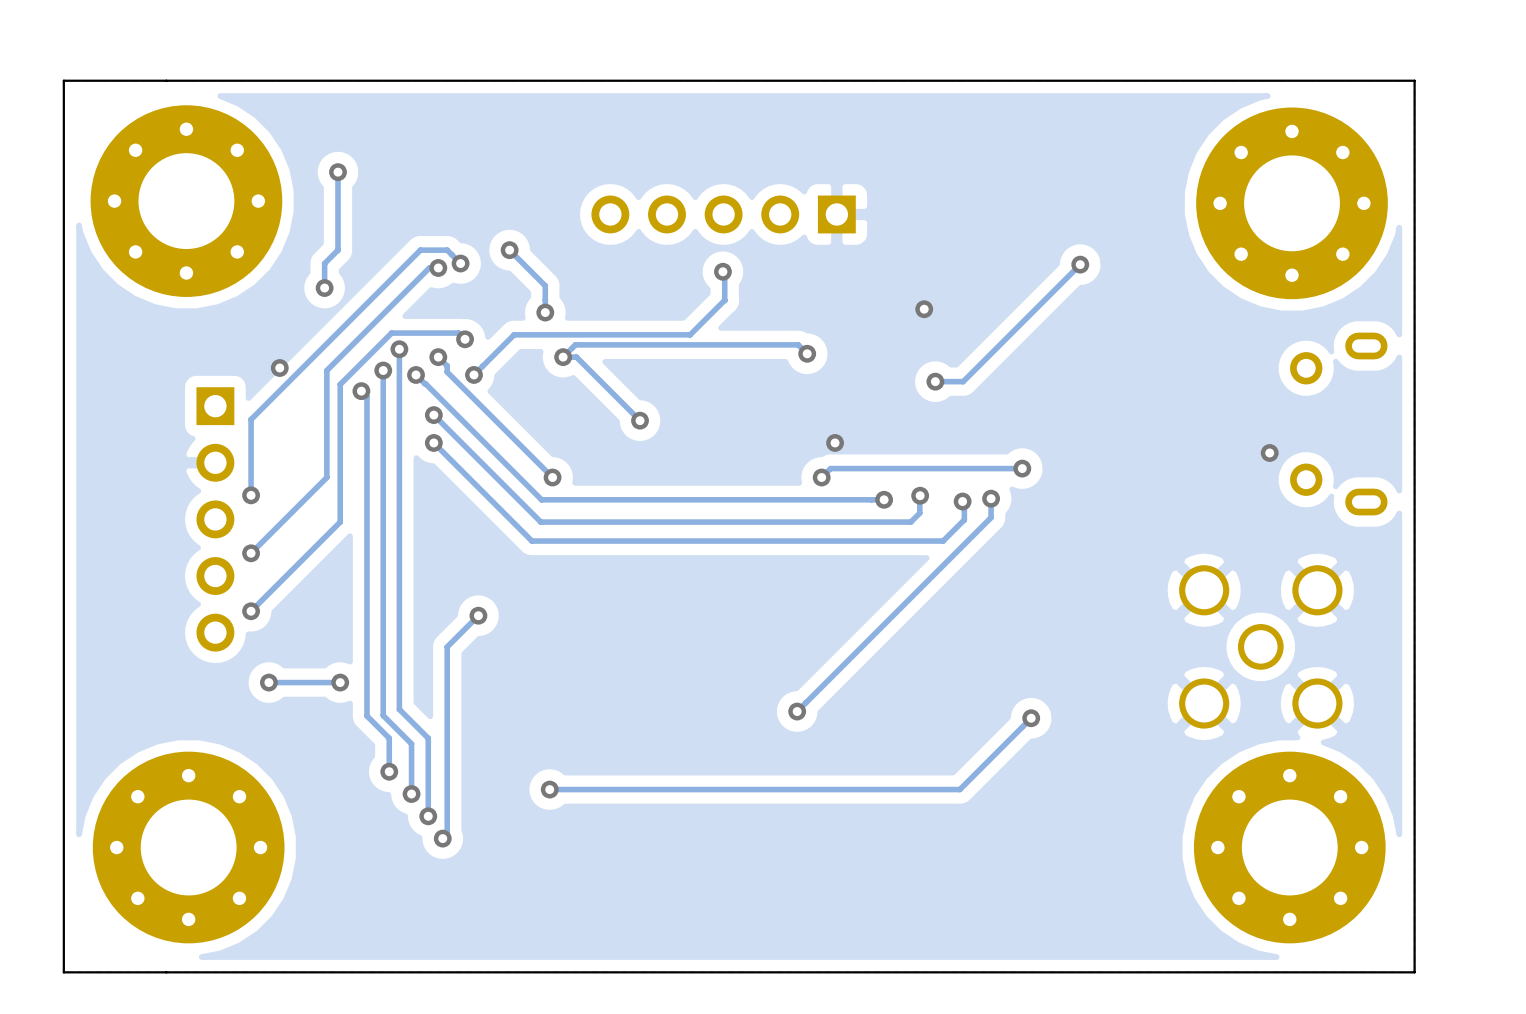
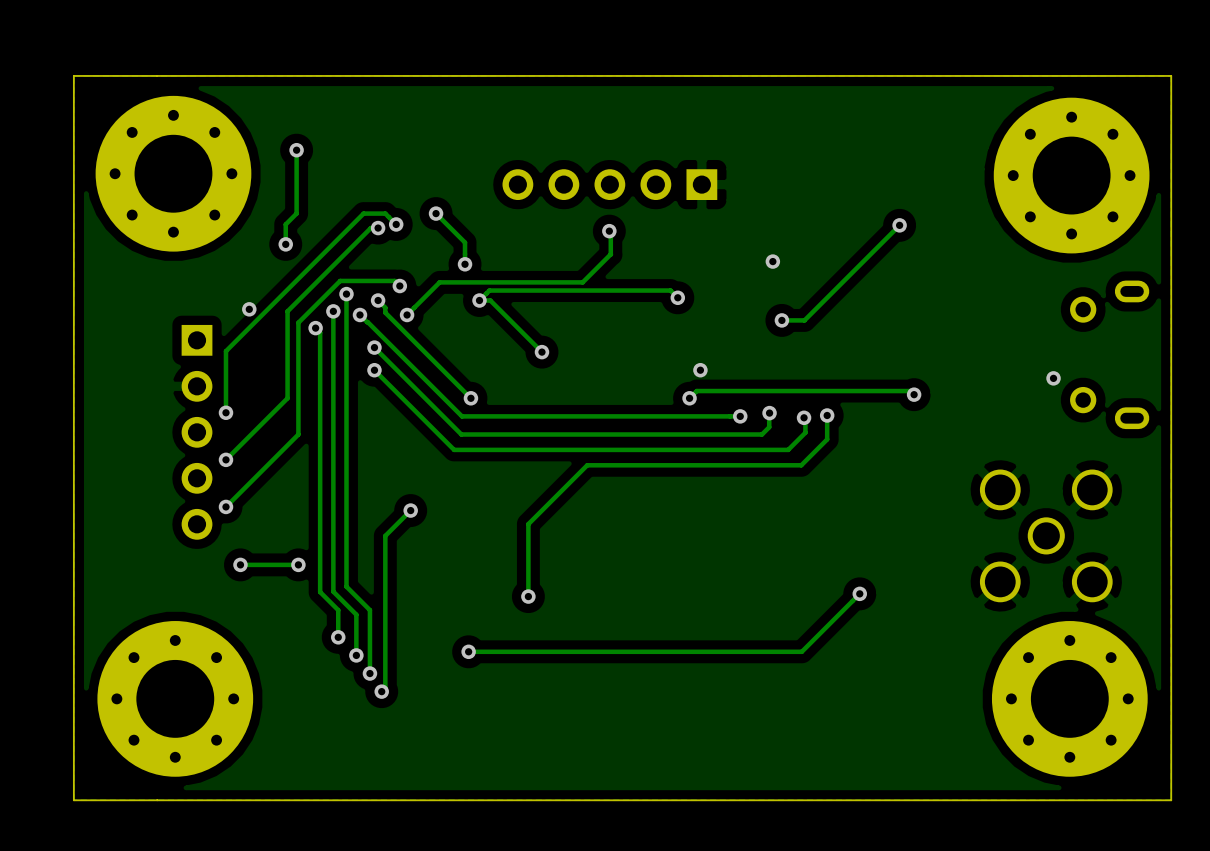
track: none -> (852, 391) (910, 391) (914, 394)
via position: (1022, 468) -> (914, 394)
track: (991, 517) (797, 711) -> (827, 430) (827, 439) (801, 465) (587, 465) (528, 524) (528, 596)
via: (797, 711) -> none
via: none -> (528, 596)

